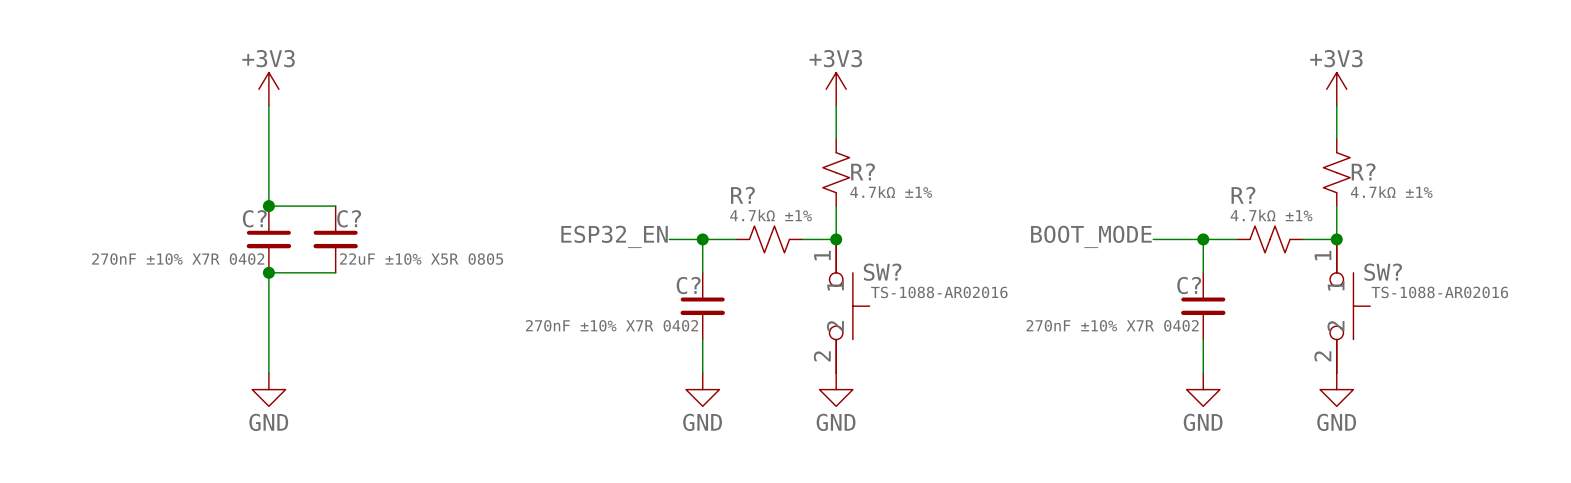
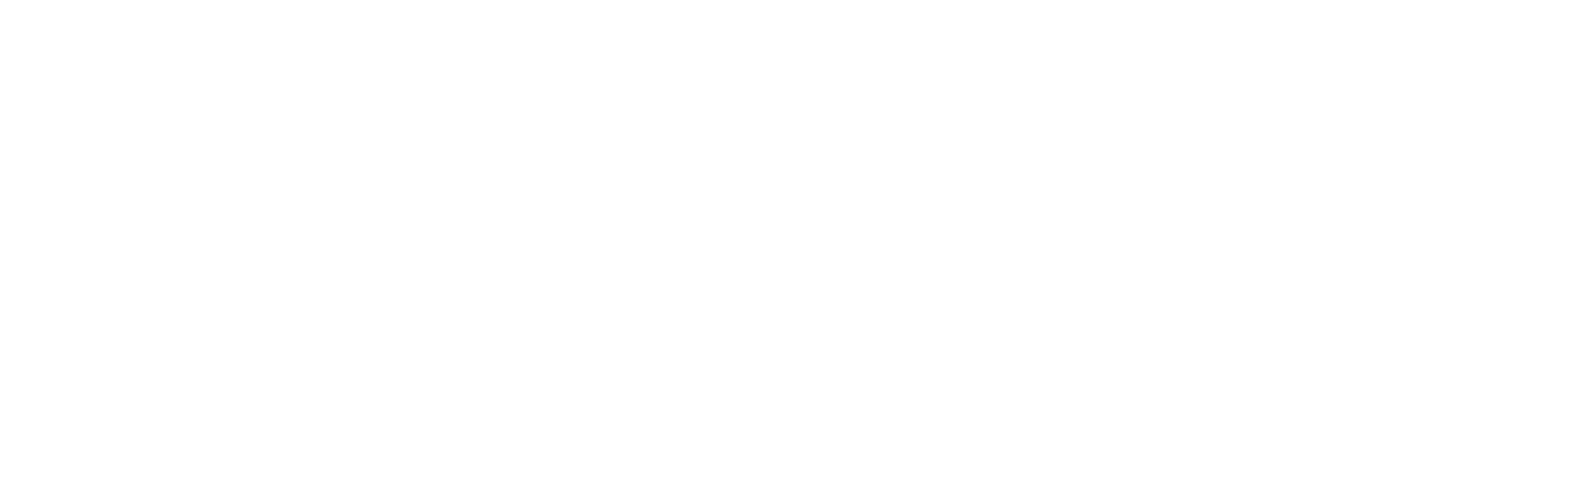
power symbol: +3V3 (268, 89) -> none
power symbol: +3V3 (836, 89) -> none
power symbol: +3V3 (1336, 89) -> none
wire: (268, 105) (268, 206) (335, 206) -> none
wire: (836, 105) (836, 139) -> none
wire: (1336, 105) (1336, 139) -> none
R?: 4.7kΩ ±1% (836, 172) -> none
R?: 4.7kΩ ±1% (1336, 172) -> none
junction: (268, 206) -> none
wire: (836, 206) (836, 239) (802, 239) -> none
wire: (1336, 206) (1336, 239) (1303, 239) -> none
label: ESP32_EN (614, 236) -> none
label: BOOT_MODE (1091, 236) -> none
C?: 270nF ±10% X7R 0402 (268, 239) -> none
C?: 22uF ±10% X5R 0805 (335, 239) -> none
wire: (669, 239) (736, 239) -> none
wire: (702, 239) (702, 272) -> none
junction: (702, 239) -> none
R?: 4.7kΩ ±1% (769, 239) -> none
junction: (836, 239) -> none
wire: (1153, 239) (1236, 239) -> none
wire: (1203, 239) (1203, 272) -> none
junction: (1203, 239) -> none
R?: 4.7kΩ ±1% (1270, 239) -> none
junction: (1336, 239) -> none
junction: (268, 272) -> none
wire: (335, 272) (268, 272) (268, 372) -> none
C?: 270nF ±10% X7R 0402 (702, 306) -> none
SW?: TS-1088-AR02016 (849, 306) -> none
C?: 270nF ±10% X7R 0402 (1203, 306) -> none
SW?: TS-1088-AR02016 (1350, 306) -> none
wire: (702, 339) (702, 372) -> none
wire: (1203, 339) (1203, 372) -> none
power symbol: GND (268, 389) -> none
power symbol: GND (702, 389) -> none
power symbol: GND (836, 389) -> none
power symbol: GND (1203, 389) -> none
power symbol: GND (1336, 389) -> none

